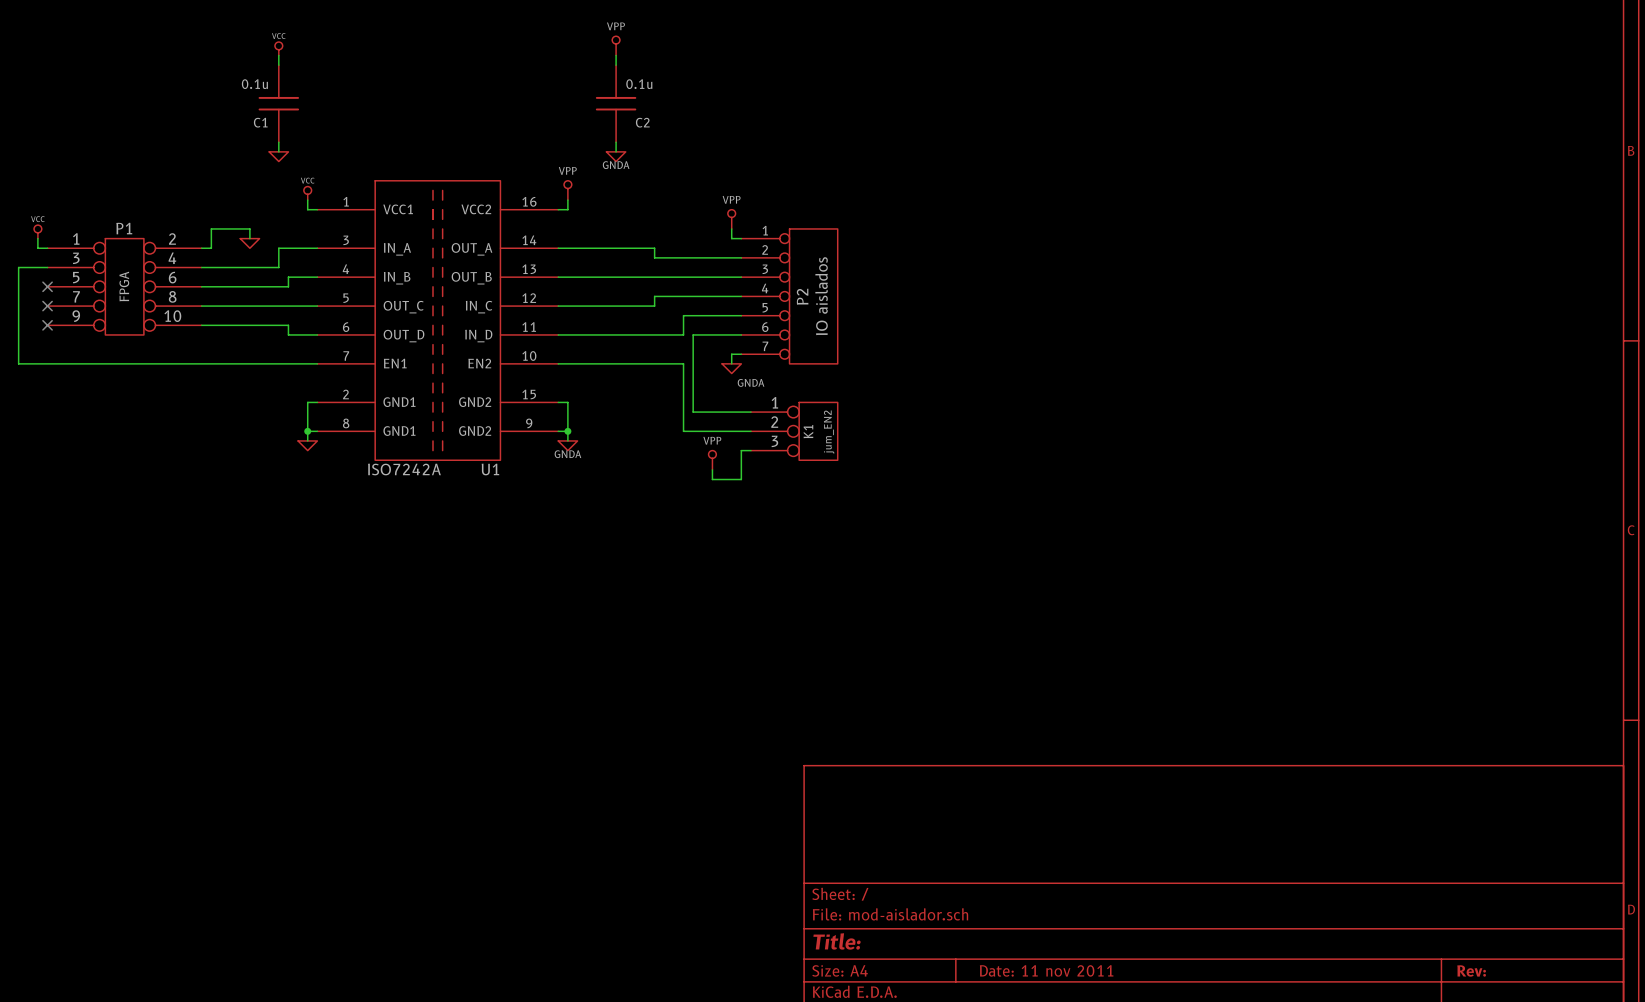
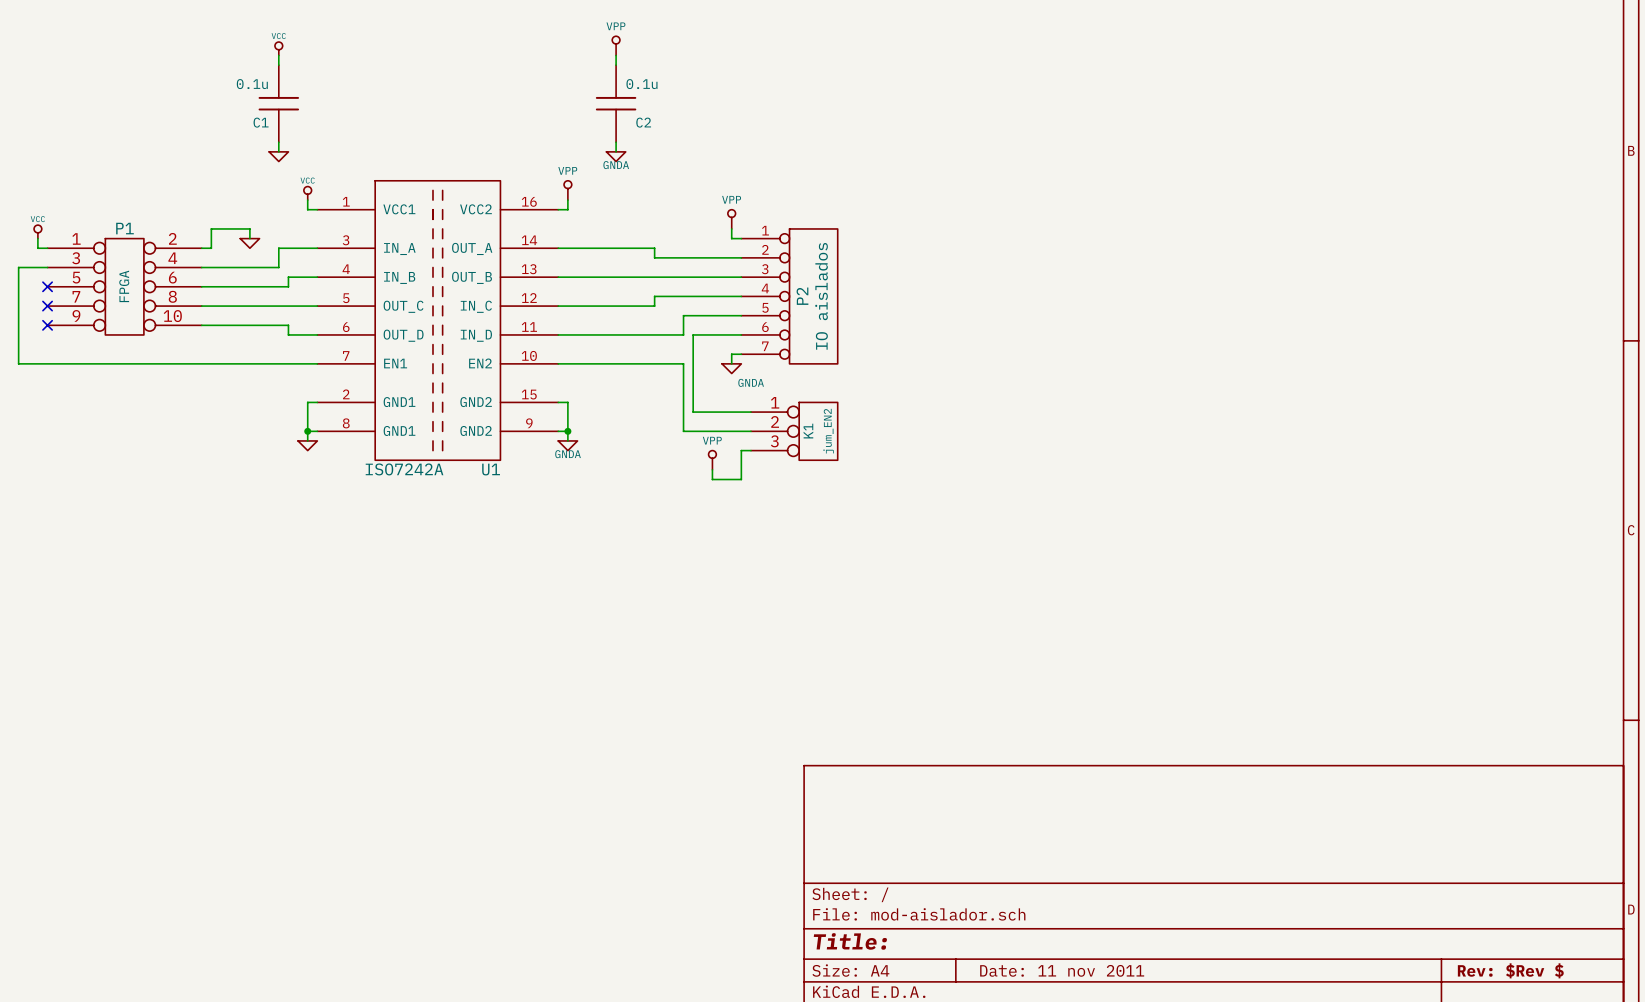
title block: Rev: (1471, 971) -> Rev: $Rev $ (1510, 970)

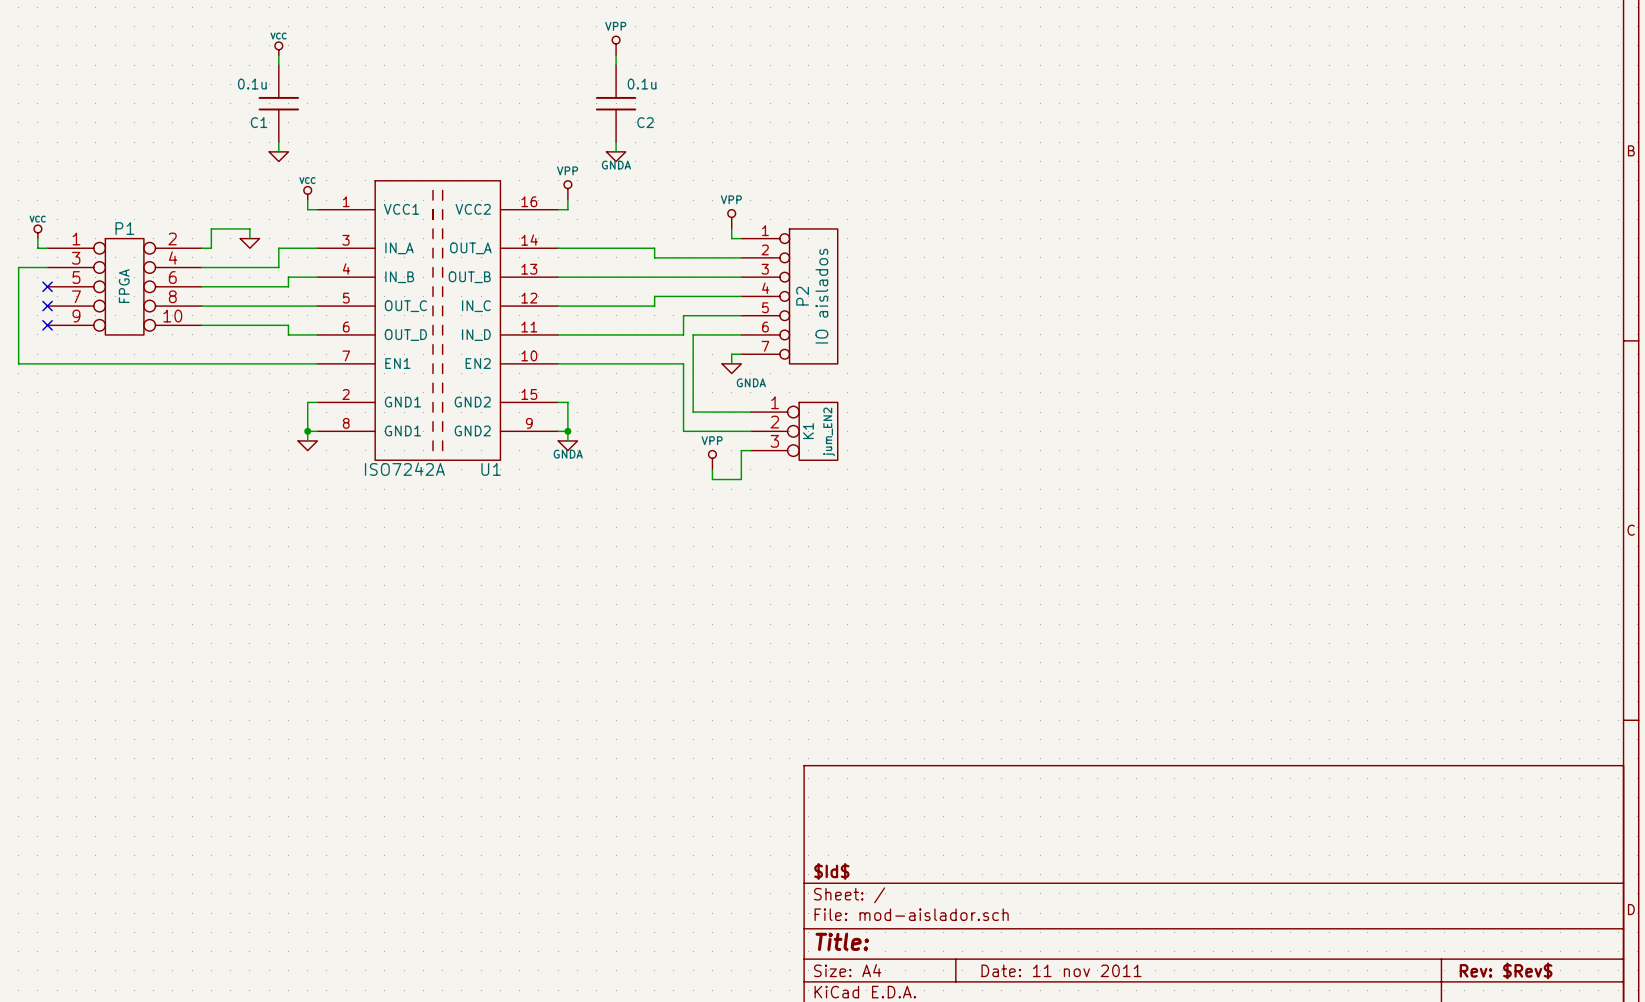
title block: none -> $Id$ (831, 871)
title block: Rev: $Rev $ (1510, 970) -> Rev: $Rev$ (1506, 970)

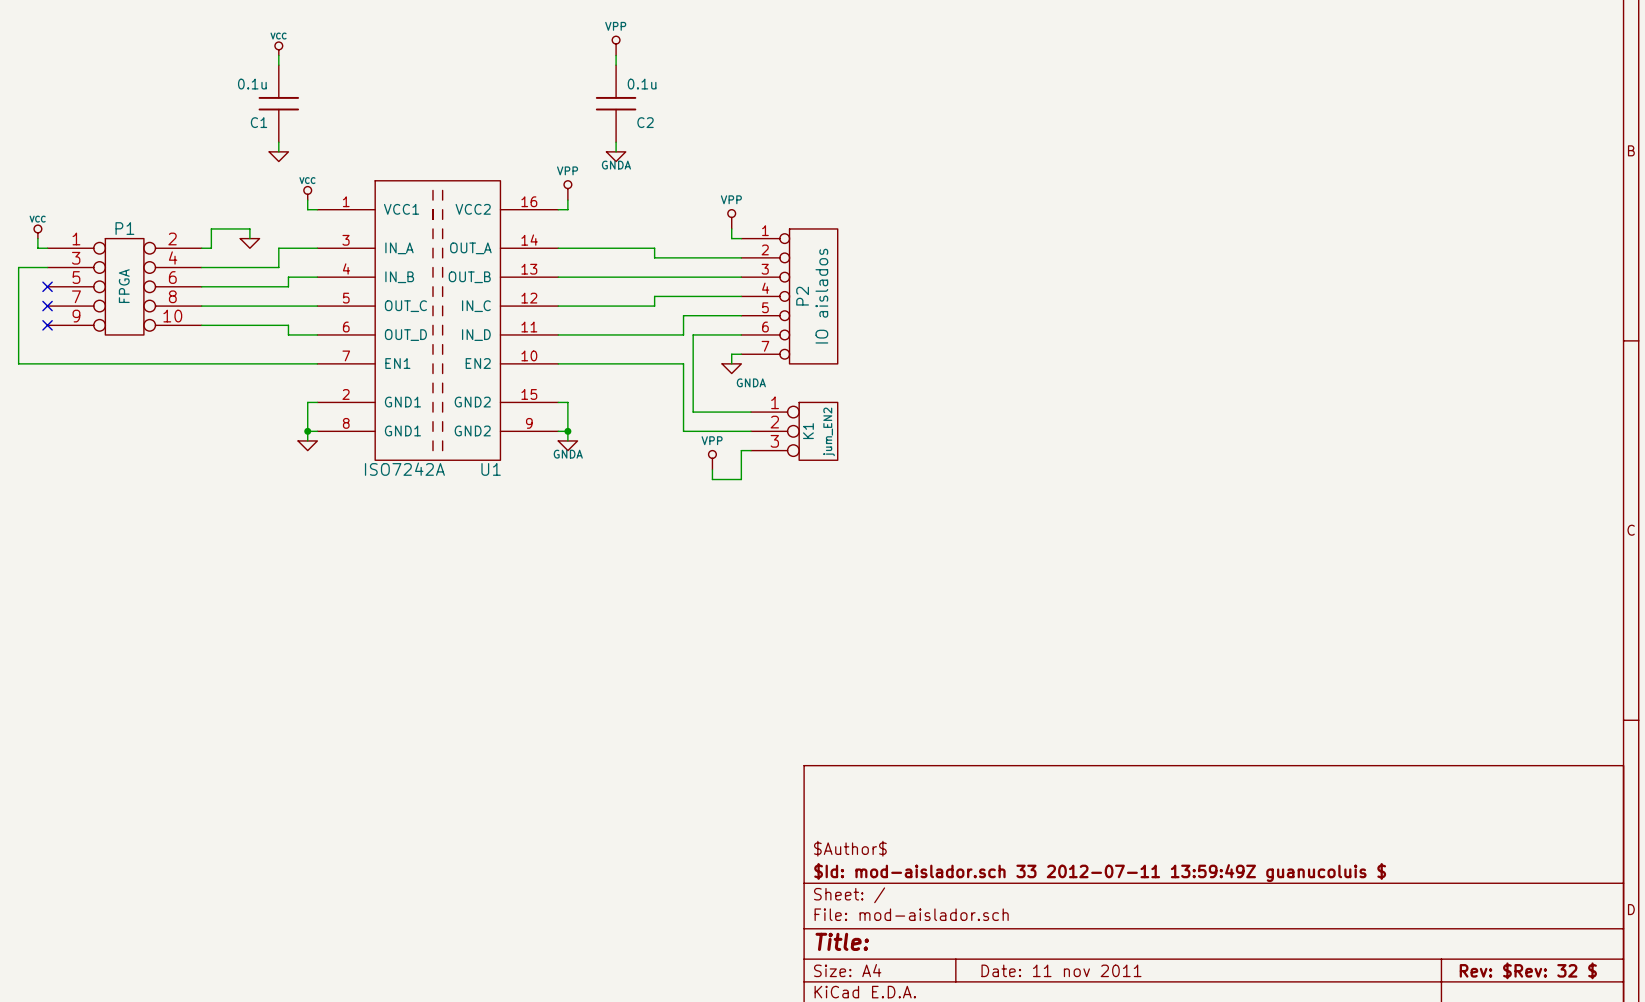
title block: none -> $Author$ (850, 848)
title block: $Id$ (831, 871) -> $Id: mod-aislador.sch 33 2012-07-11 13:59:49Z guanucoluis $ (1100, 872)
title block: Rev: $Rev$ (1506, 970) -> Rev: $Rev: 32 $ (1528, 970)

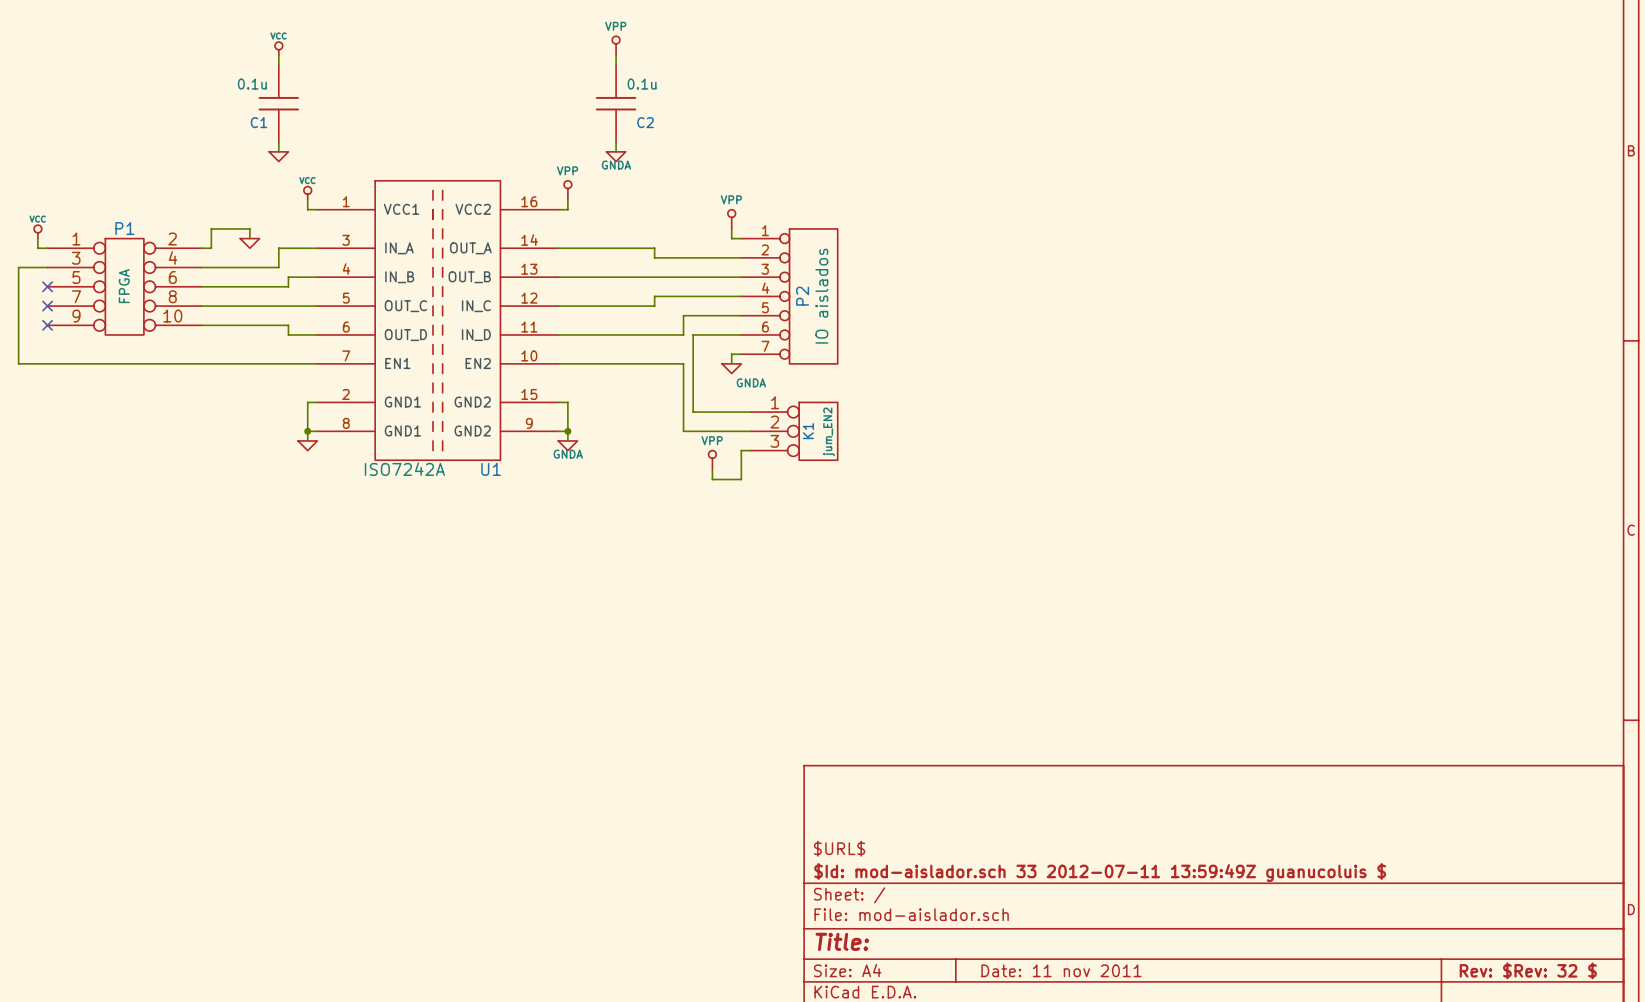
title block: $Author$ (850, 848) -> $URL$ (839, 848)

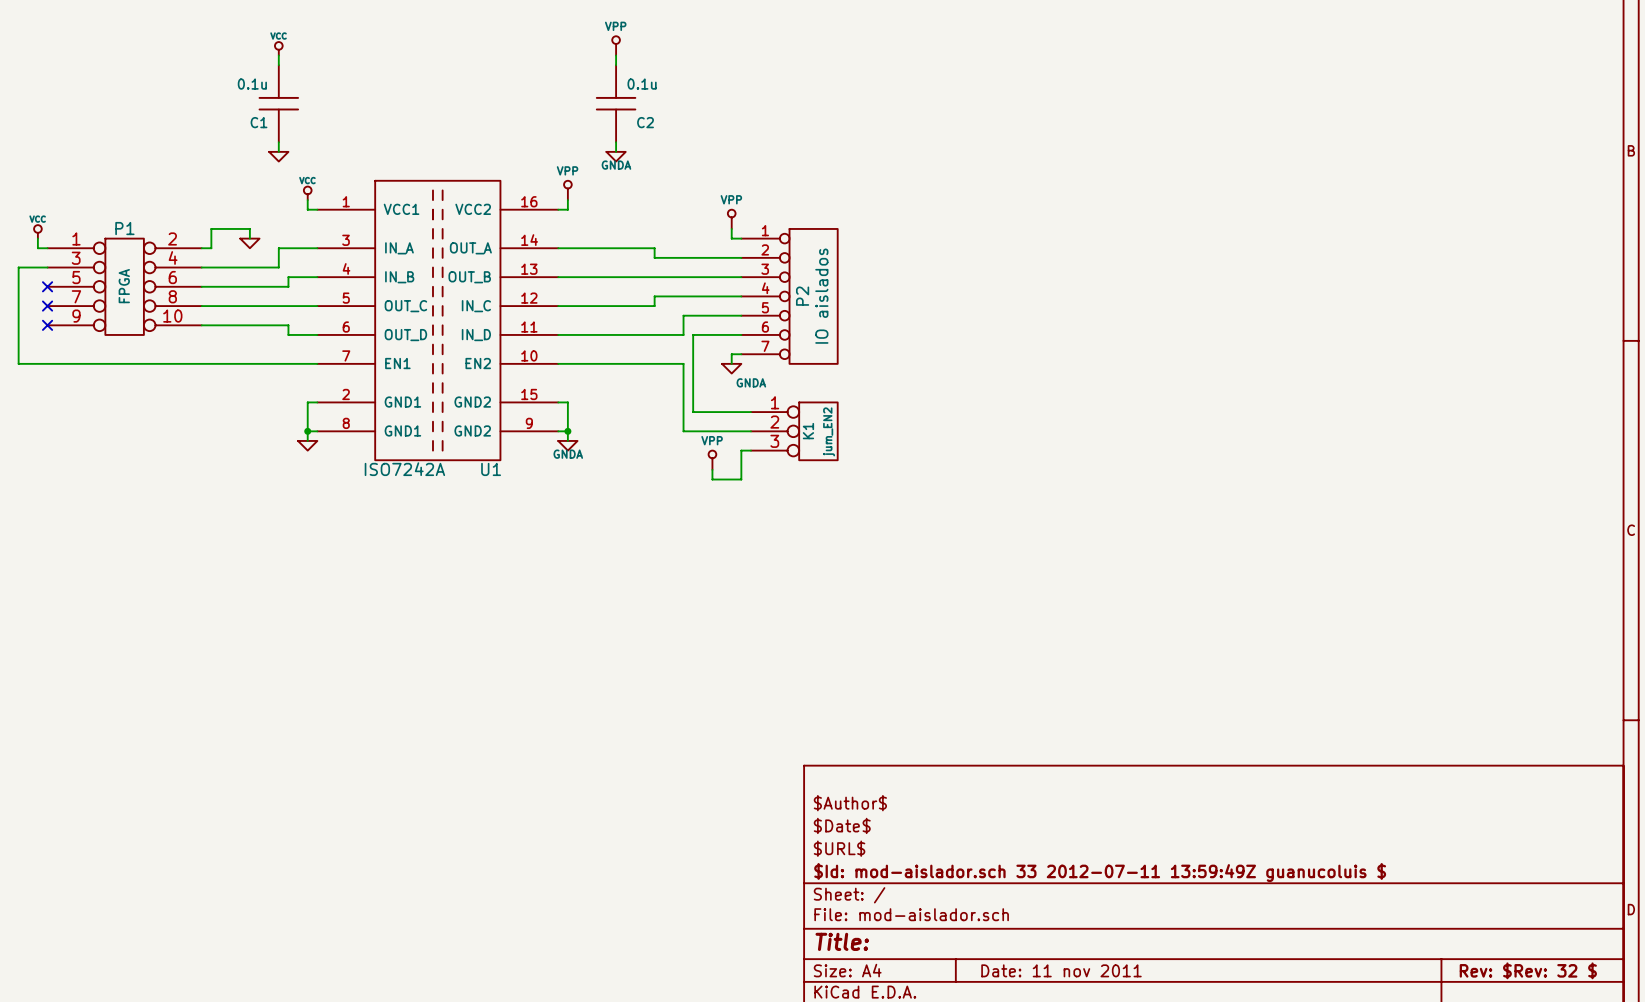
title block: none -> $Author$ (850, 803)
title block: none -> $Date$ (842, 825)

